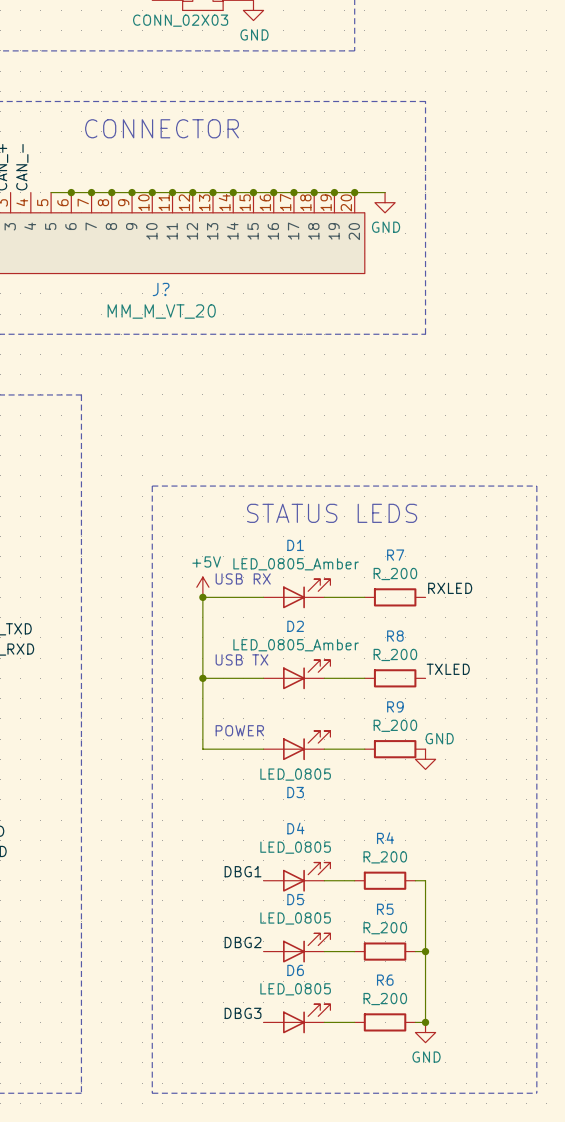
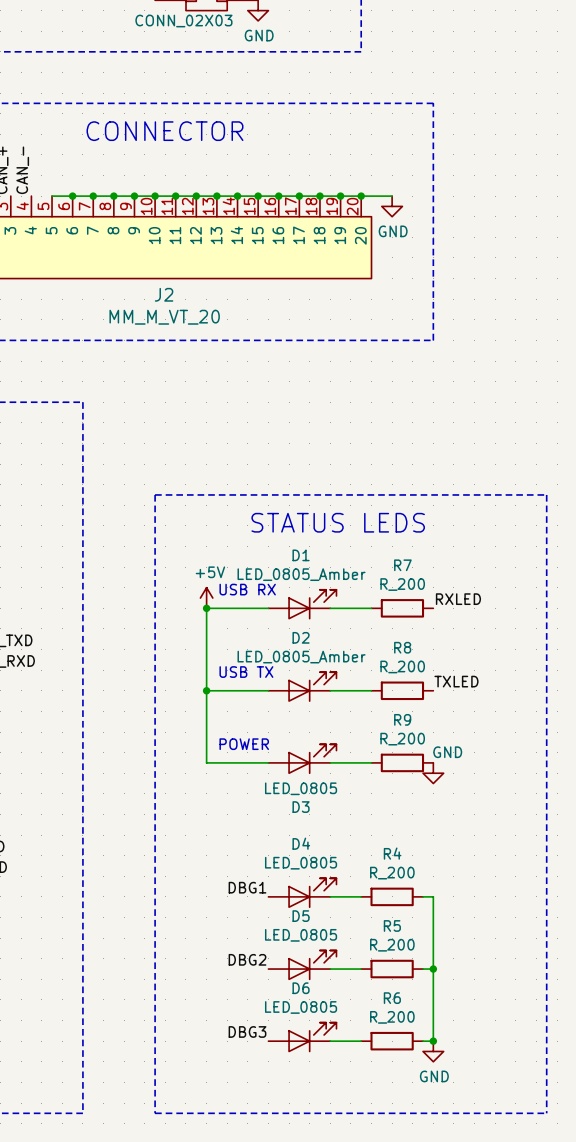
J? name: J? (161, 289) -> J2 (164, 294)

